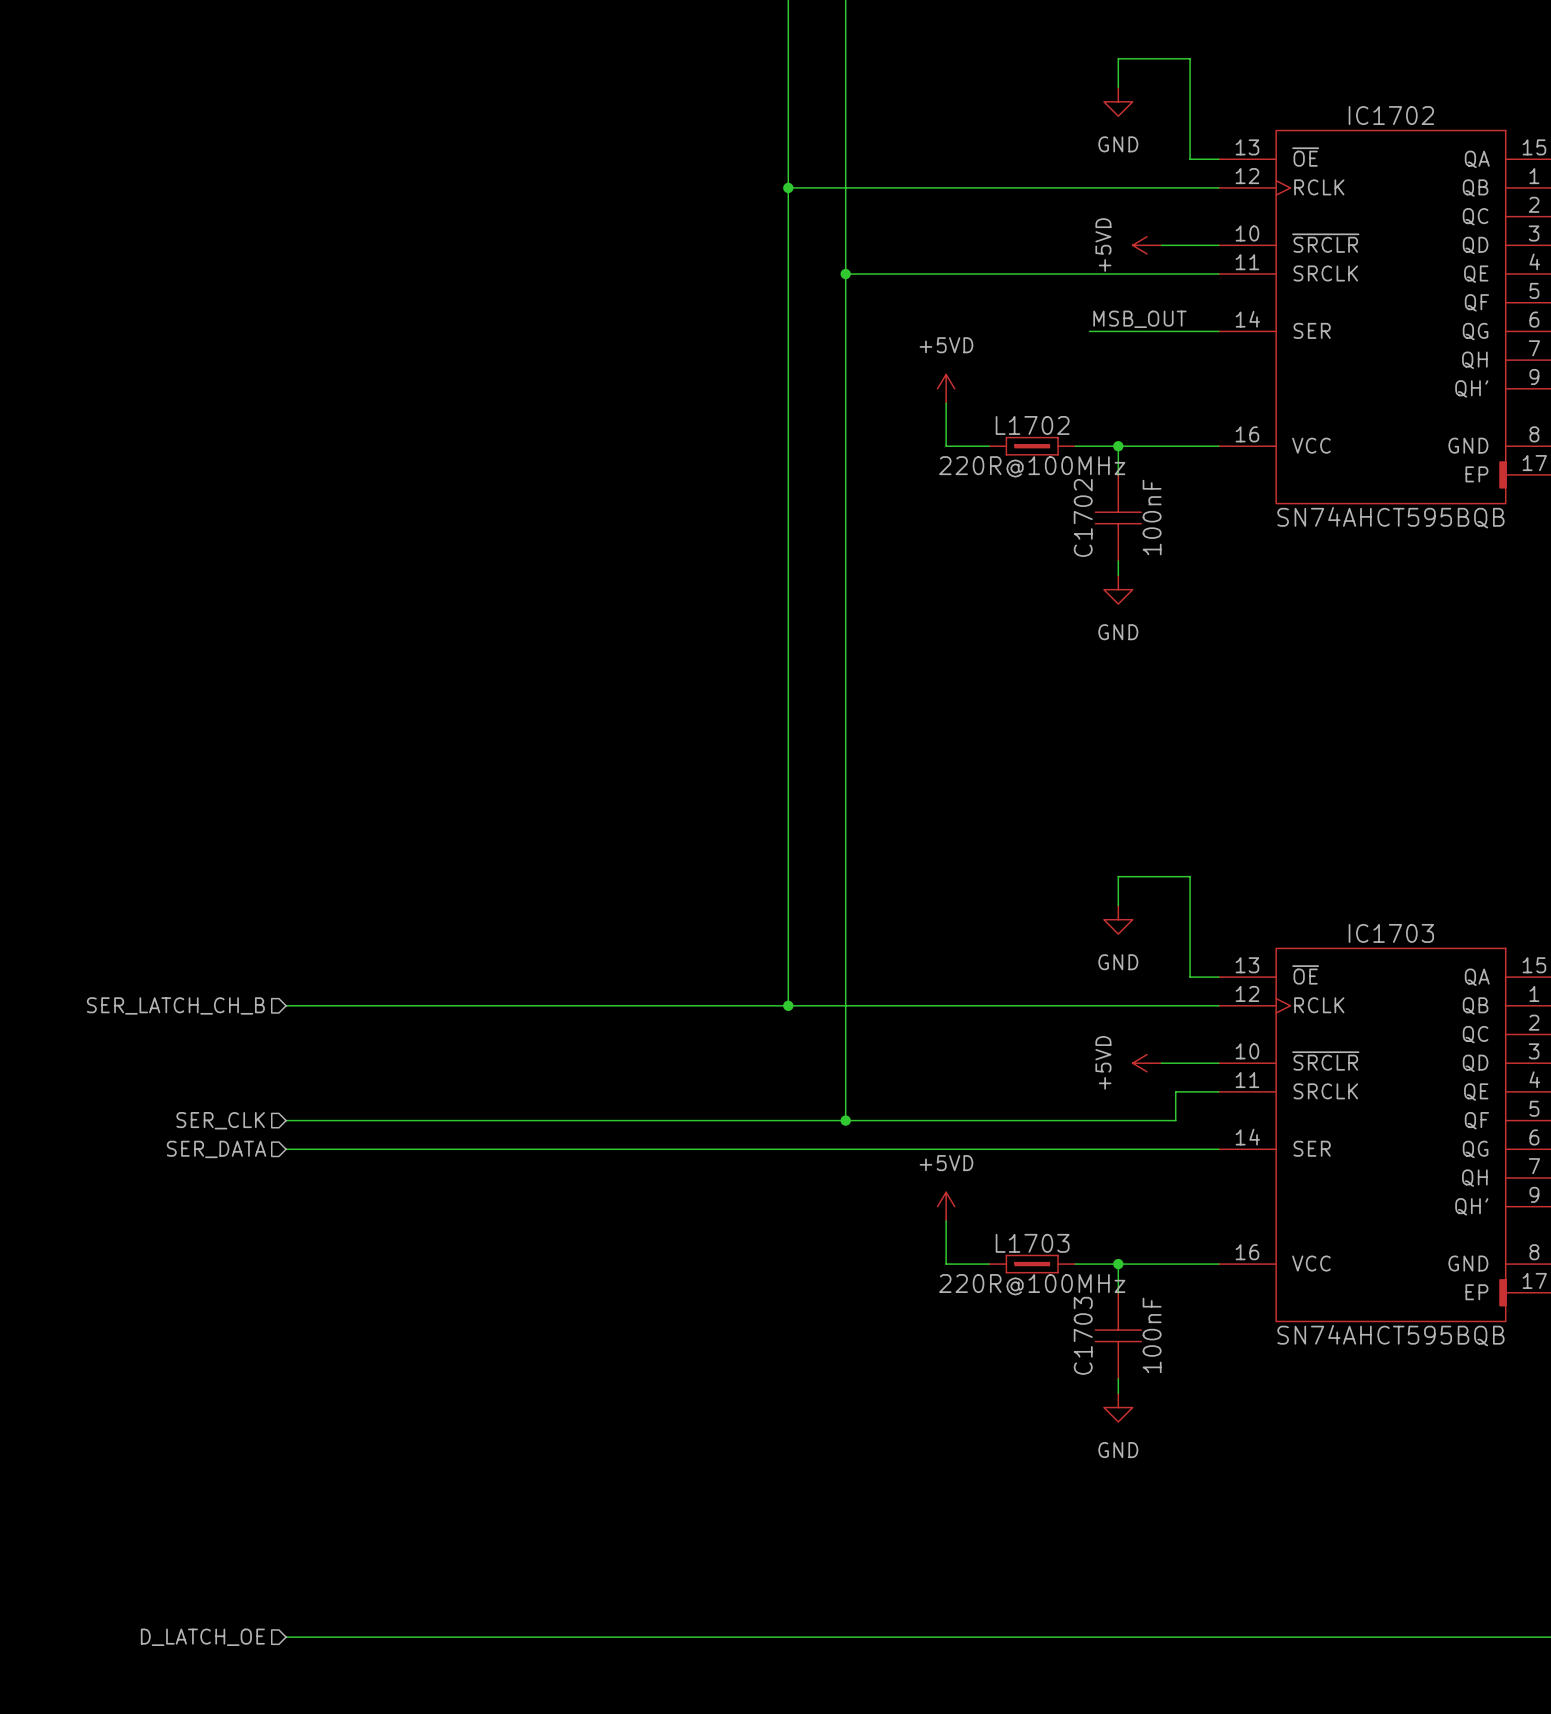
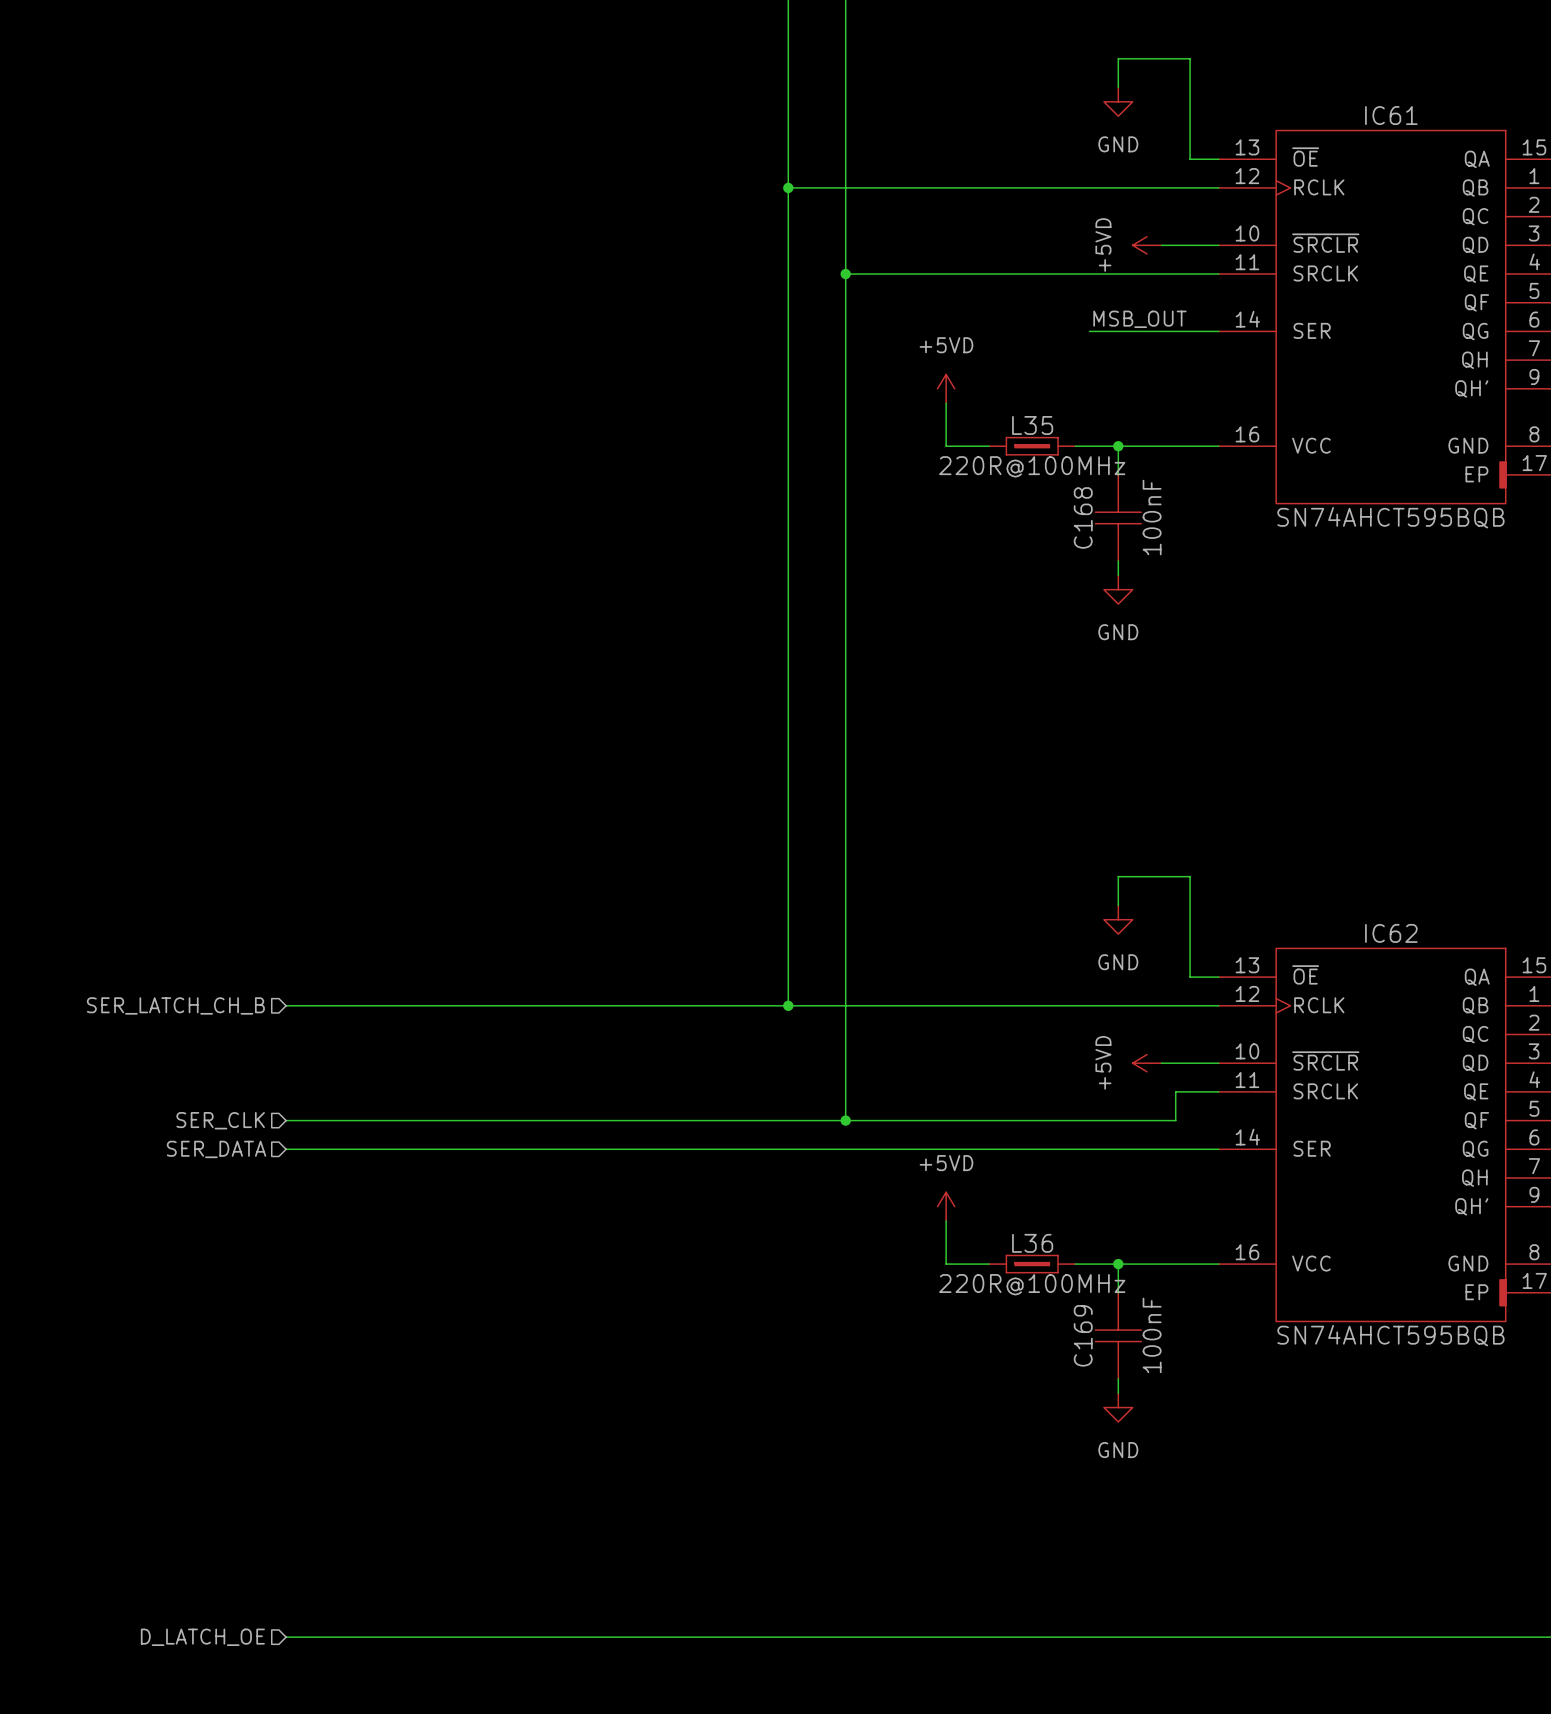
IC1702 name: IC1702 (1391, 115) -> IC61 (1391, 115)
L1702 name: L1702 (1032, 425) -> L35 (1032, 425)
C1702 name: C1702 (1083, 517) -> C168 (1083, 517)
IC1703 name: IC1703 (1391, 933) -> IC62 (1391, 933)
L1703 name: L1703 (1032, 1243) -> L36 (1032, 1243)
C1703 name: C1703 (1083, 1335) -> C169 (1083, 1335)

